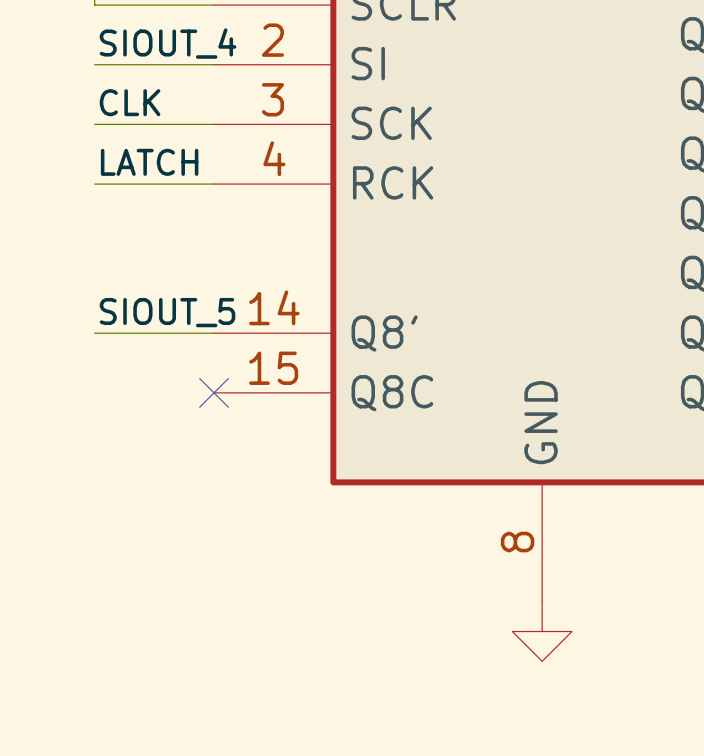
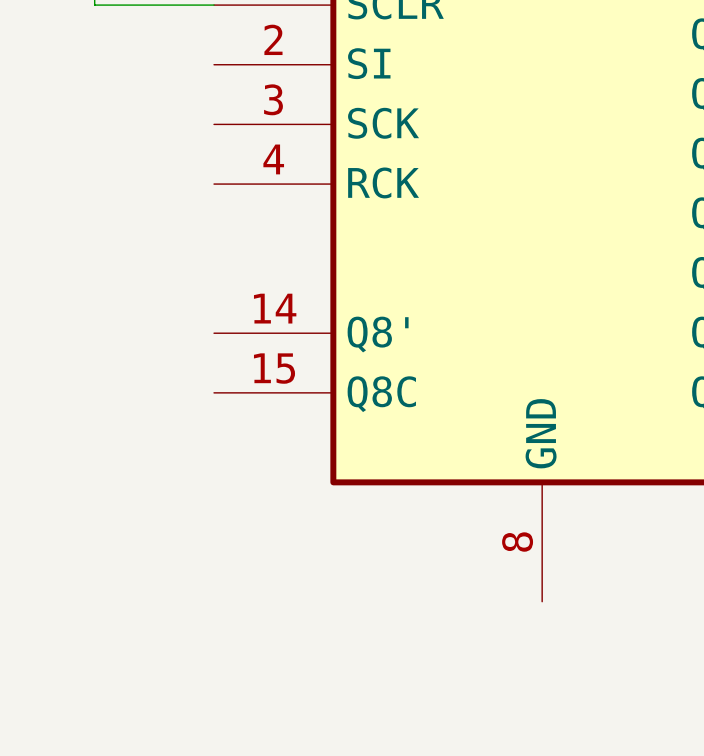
label: SIOUT_4 (168, 43) -> none
wire: (94, 64) (214, 64) -> none
label: CLK (130, 102) -> none
wire: (94, 124) (214, 124) -> none
label: LATCH (149, 162) -> none
wire: (94, 184) (214, 184) -> none
label: SIOUT_5 (167, 312) -> none
wire: (94, 333) (214, 333) -> none
no-connect mark: (214, 392) -> none
power symbol: (542, 631) -> none

